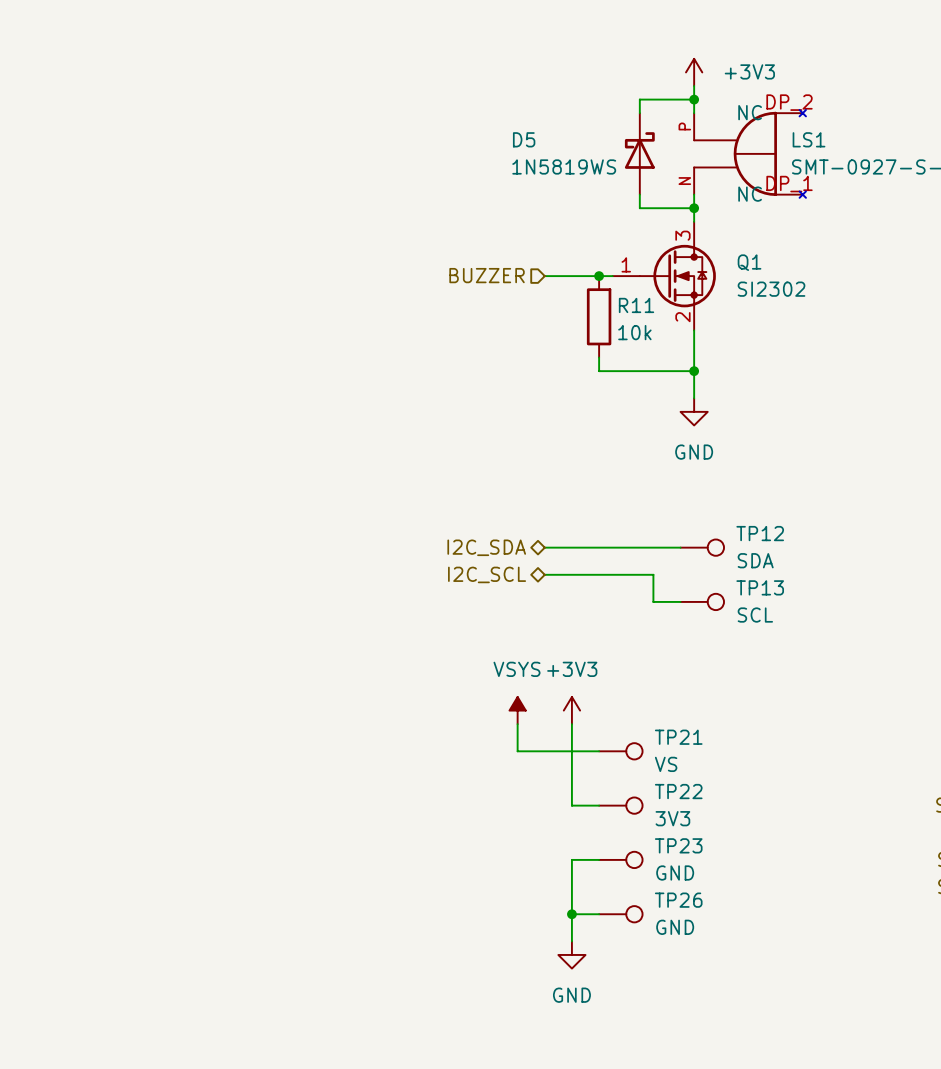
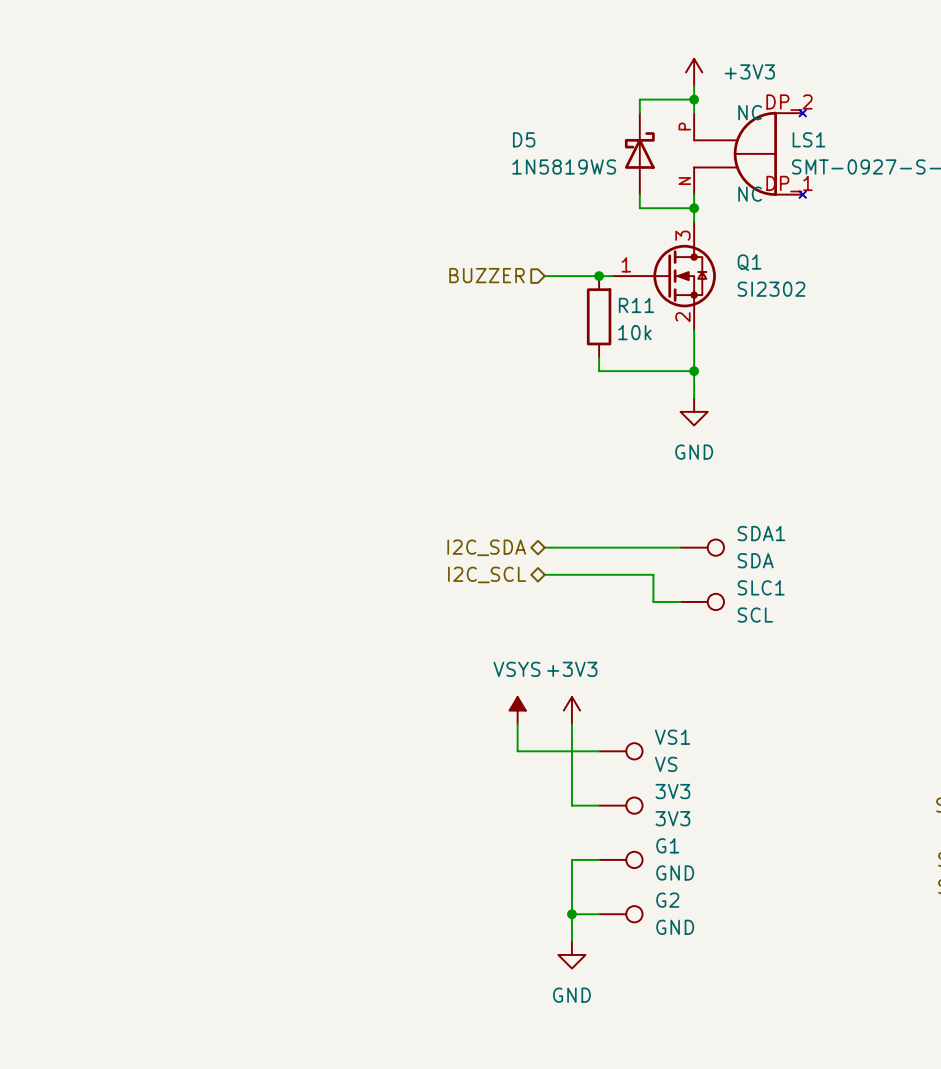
TP12 name: TP12 (760, 533) -> SDA1 (761, 533)
TP13 name: TP13 (760, 587) -> SLC1 (761, 587)
TP21 name: TP21 (678, 737) -> VS1 (672, 737)
TP22 name: TP22 (678, 791) -> 3V3 (672, 791)
TP23 name: TP23 (678, 845) -> G1 (667, 845)
TP26 name: TP26 (678, 900) -> G2 (667, 900)

